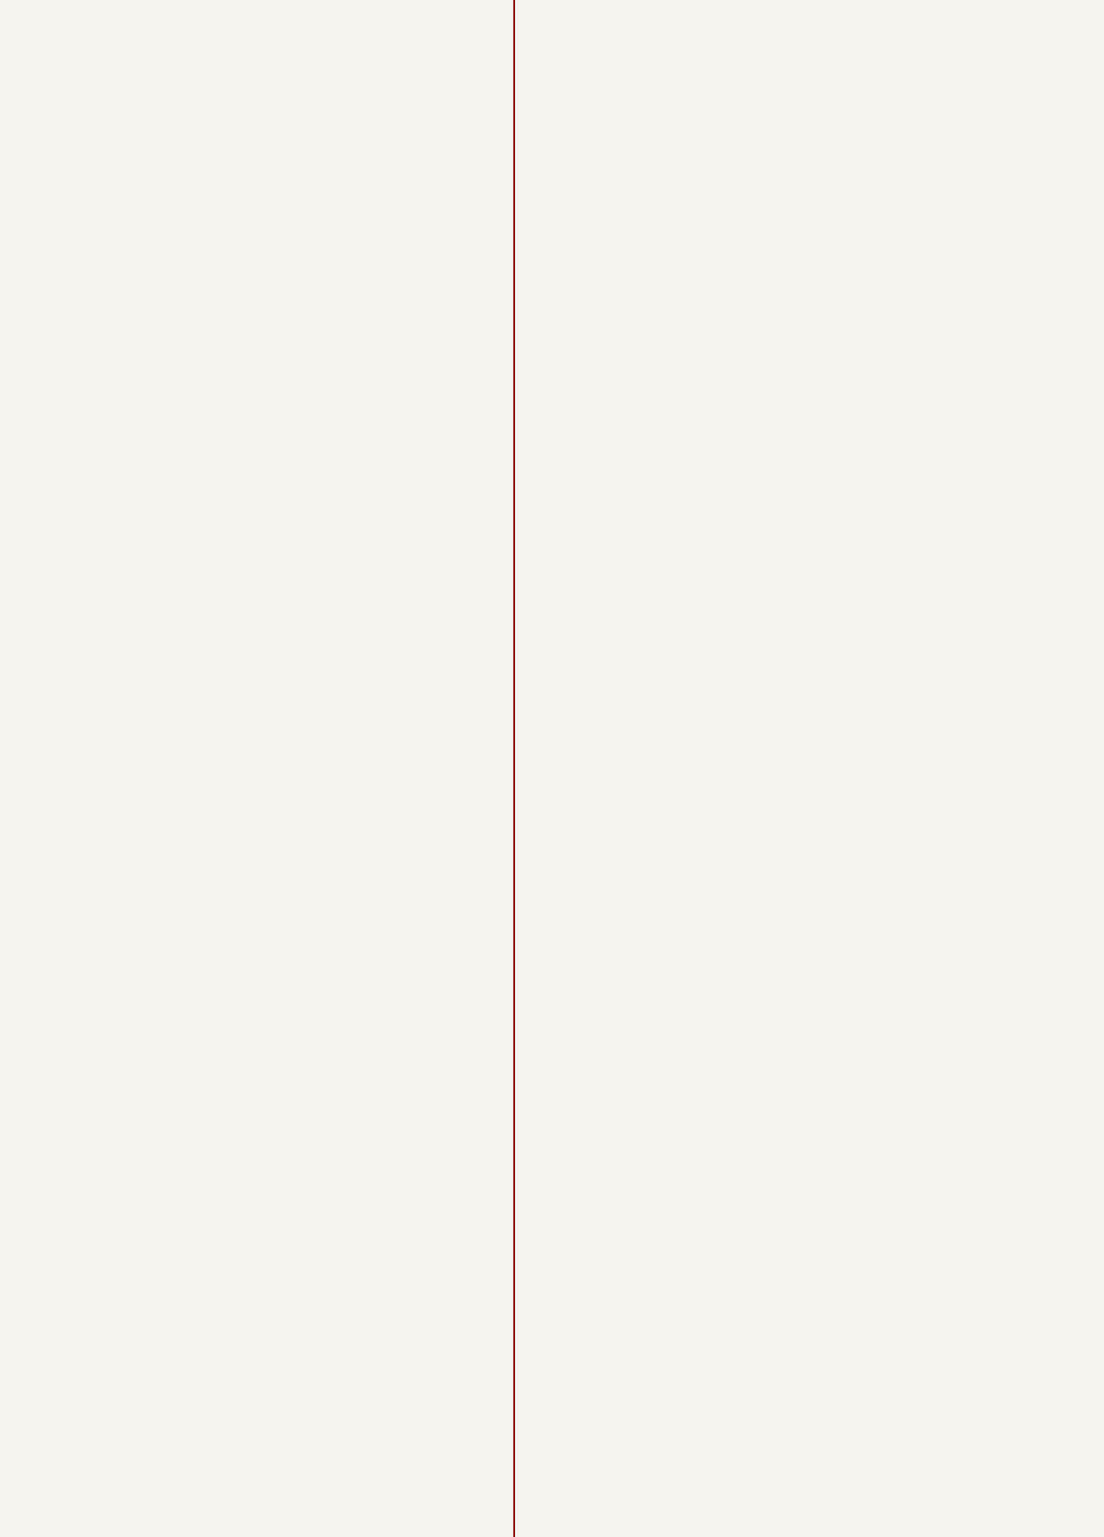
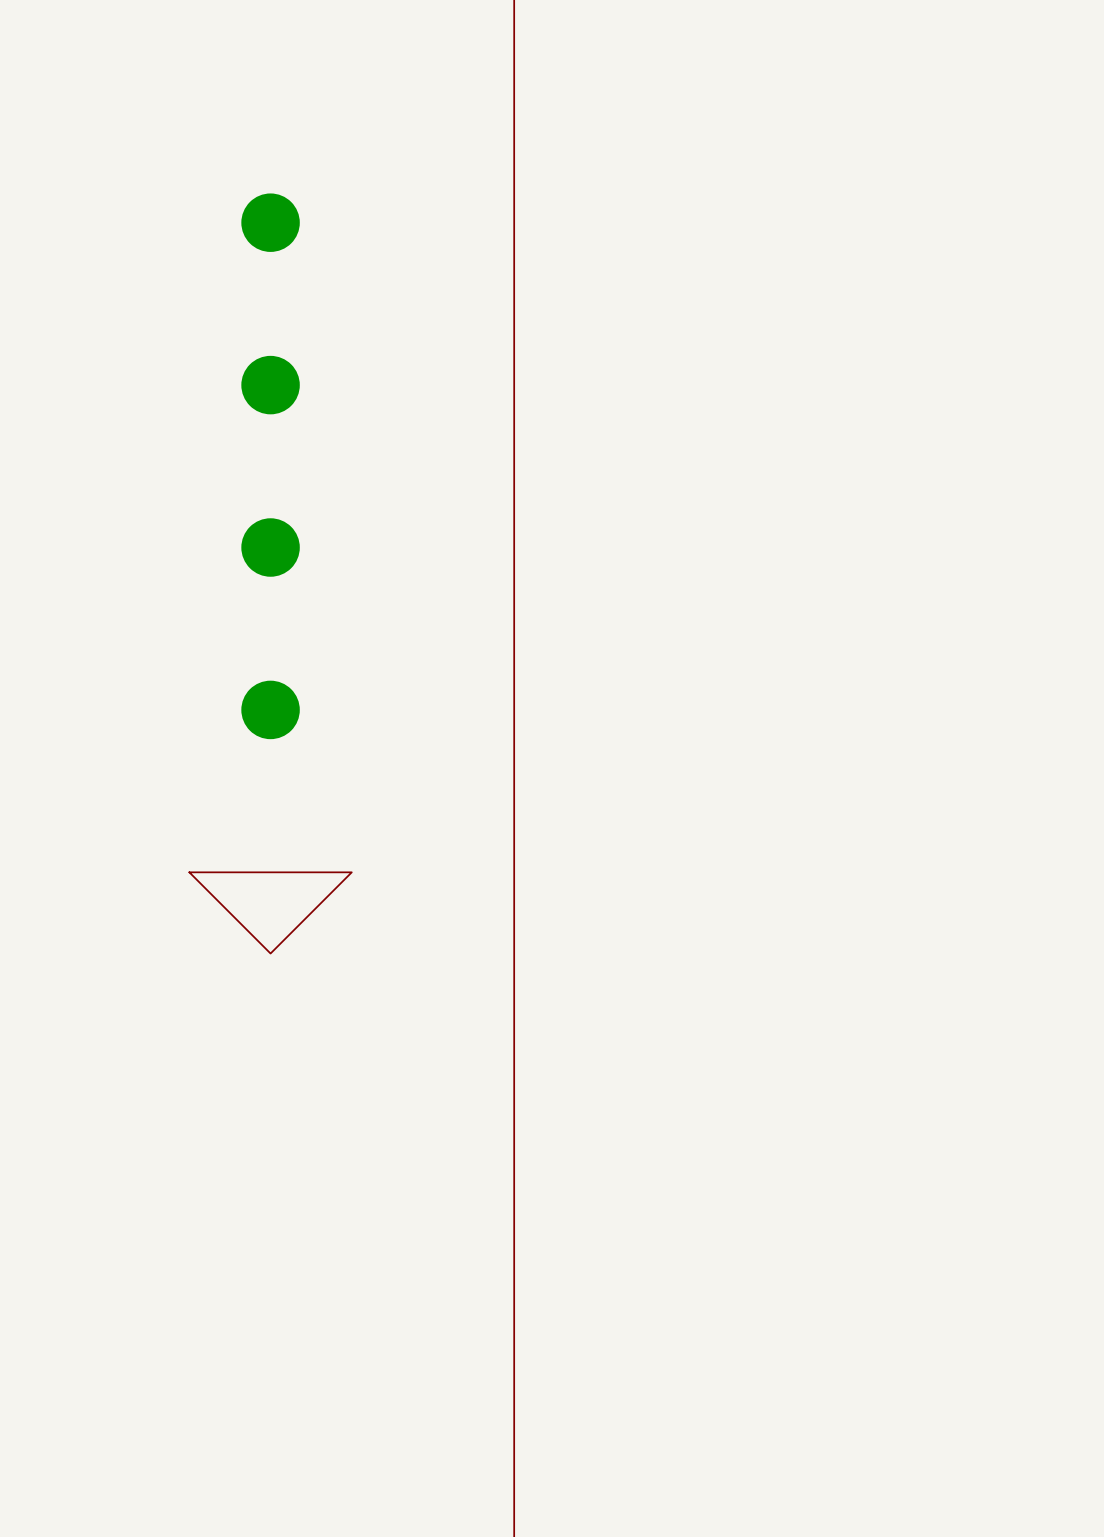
junction: none -> (270, 222)
junction: none -> (270, 385)
junction: none -> (270, 547)
junction: none -> (270, 709)
power symbol: none -> (270, 912)

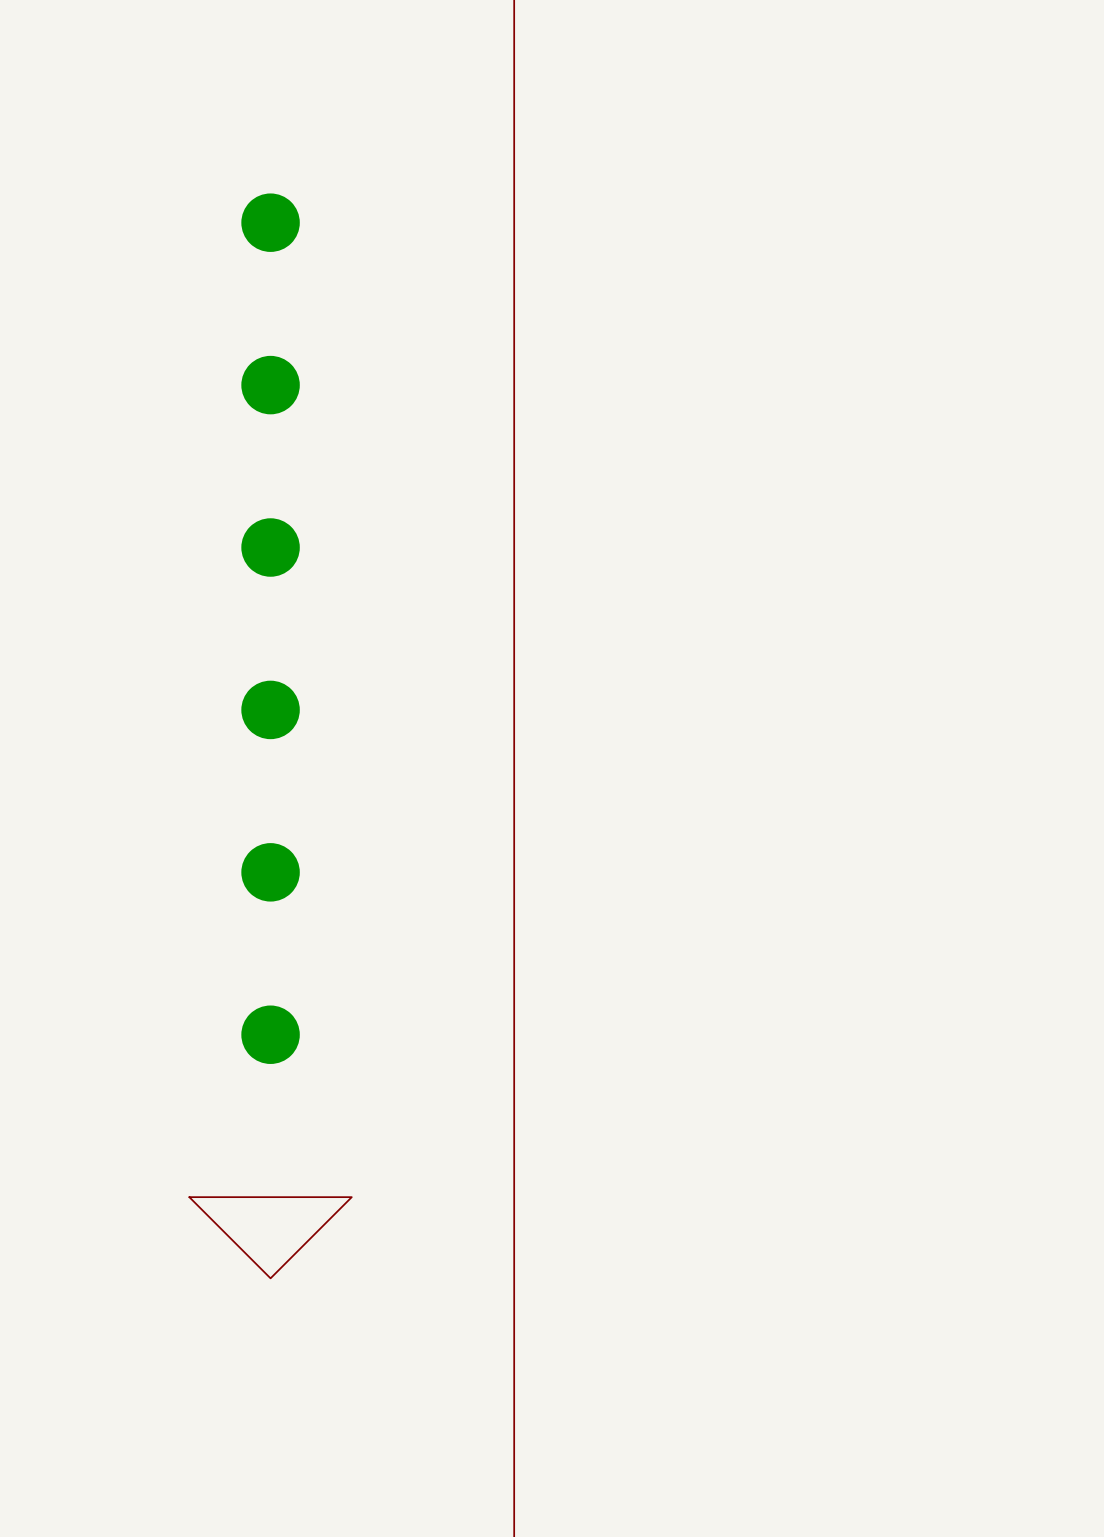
junction: none -> (270, 872)
power symbol position: (270, 912) -> (270, 1237)
junction: none -> (270, 1034)

